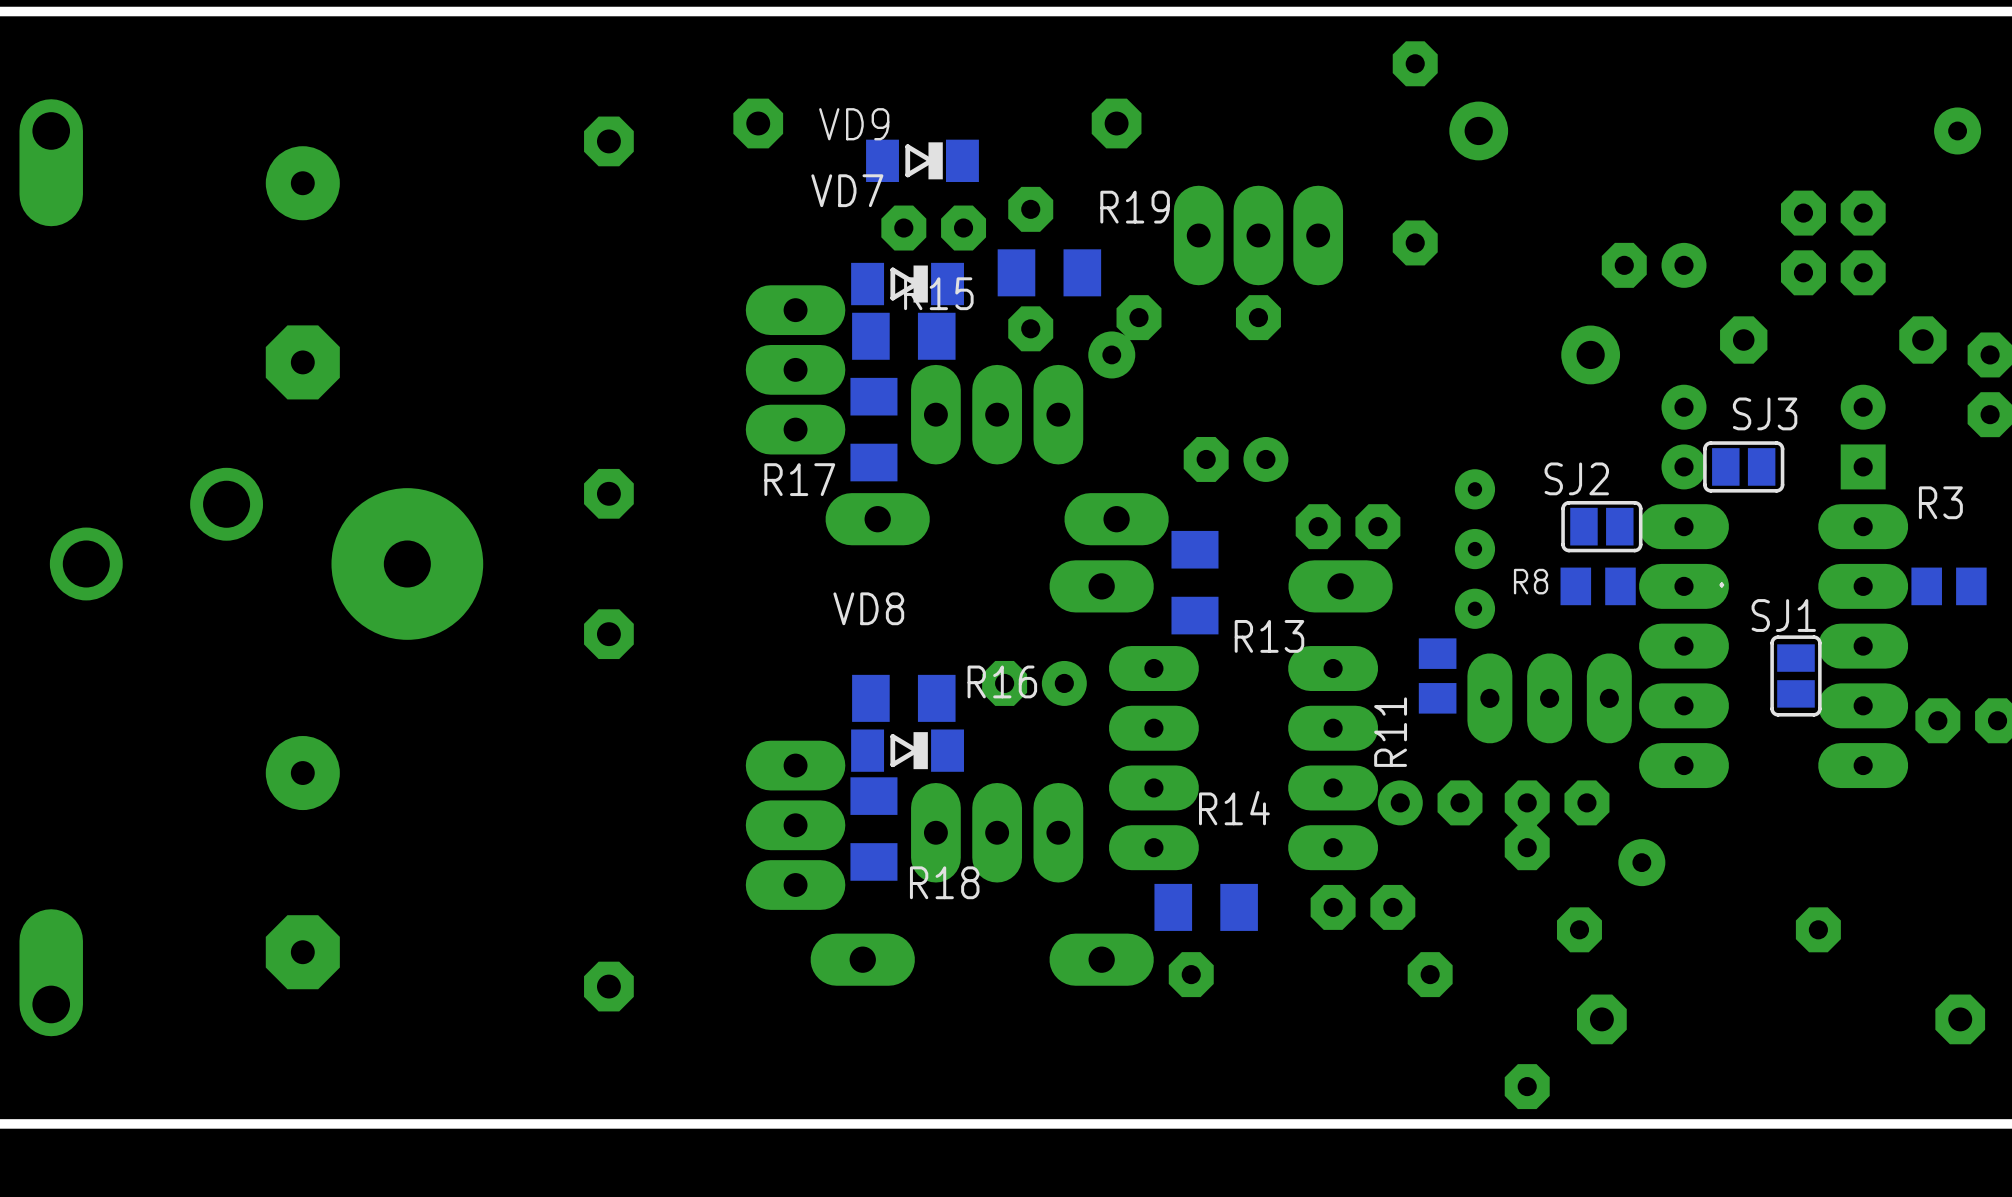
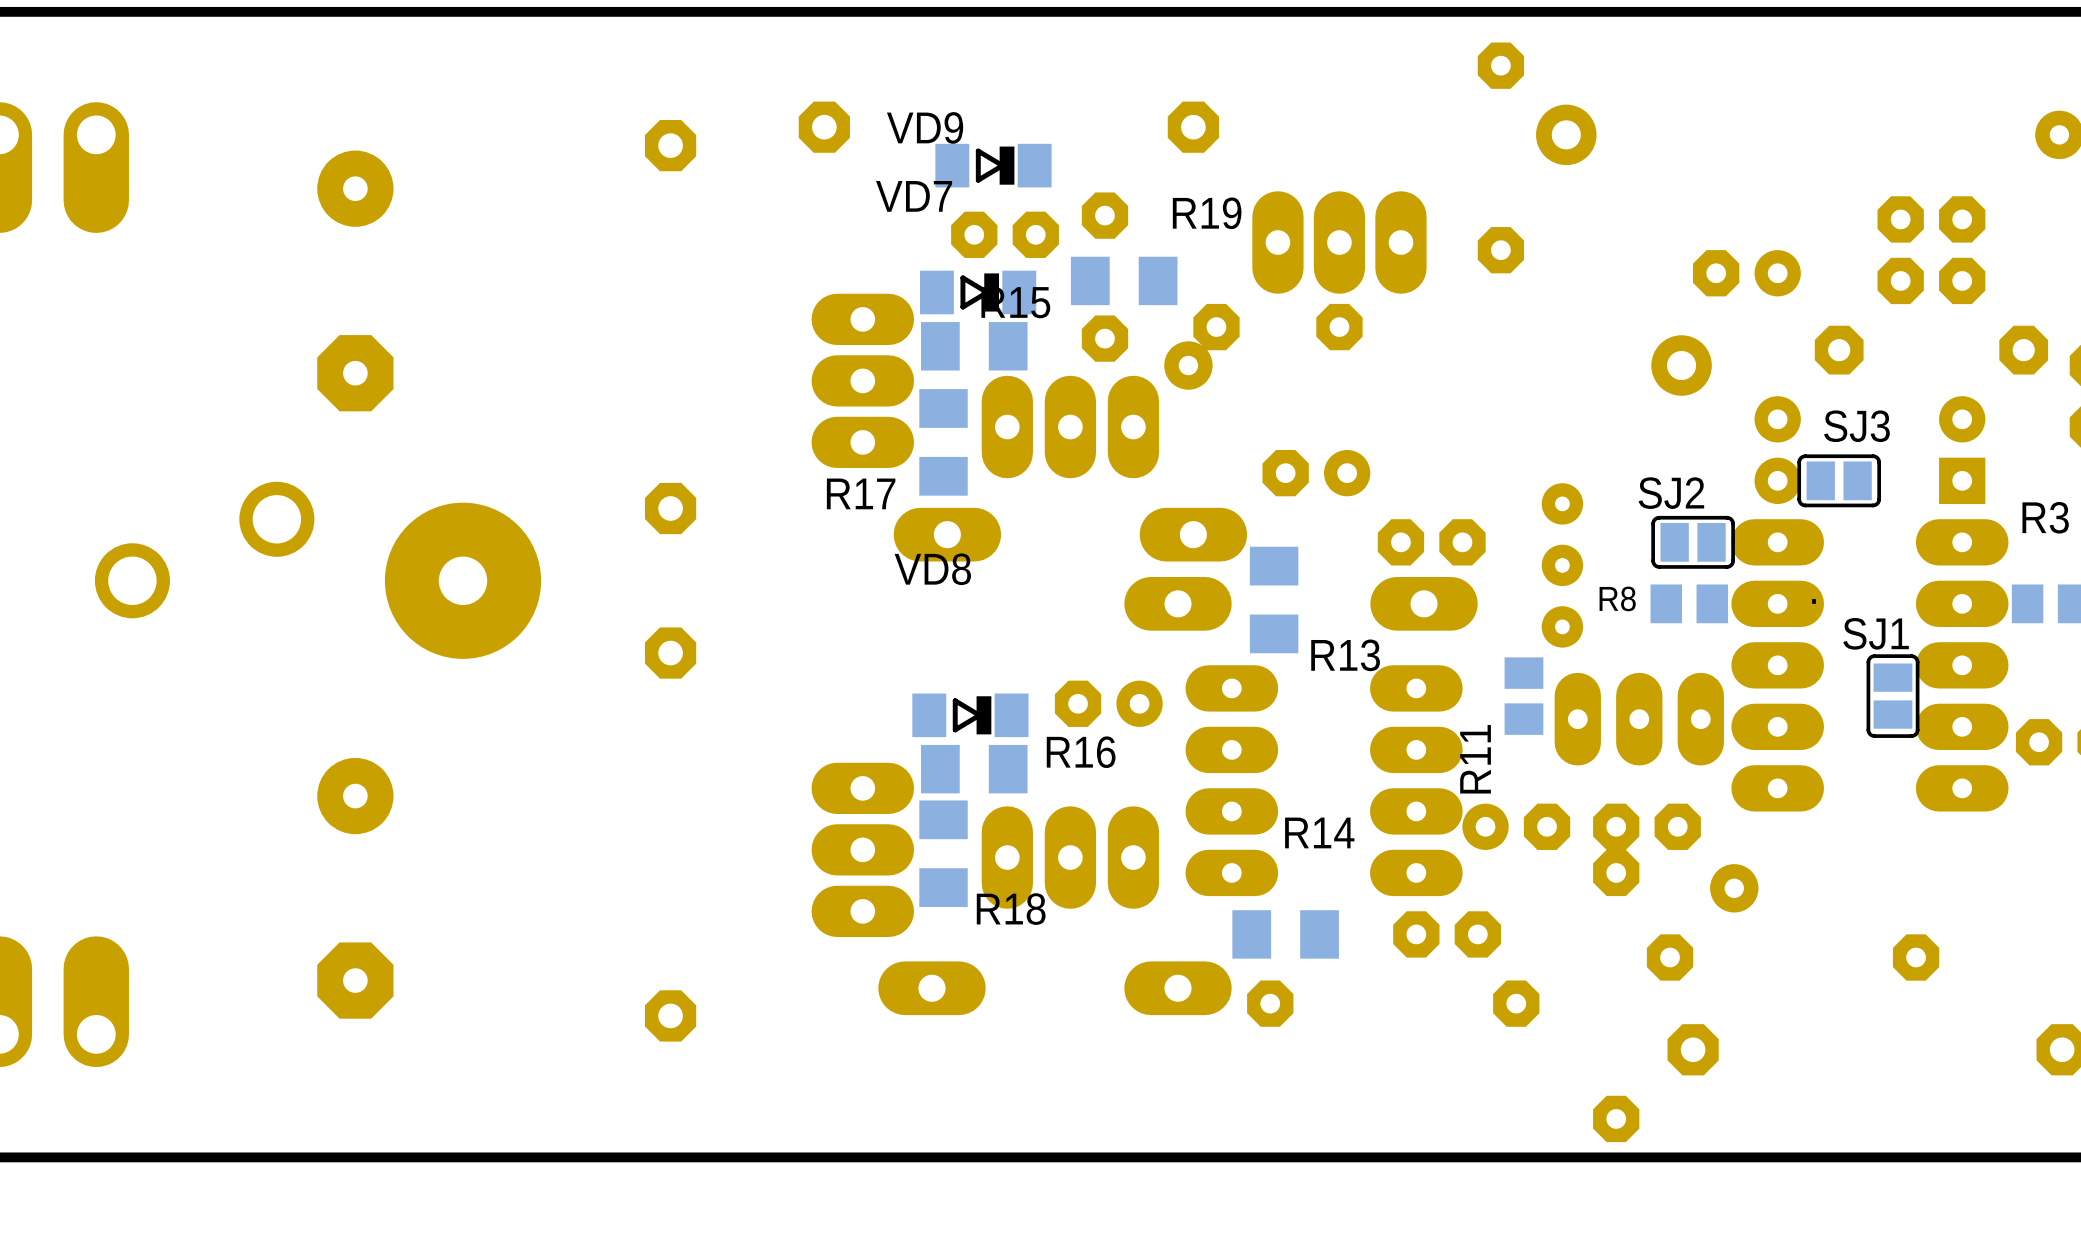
R16 position: (903, 698) -> (974, 769)
VD8 position: (907, 750) -> (970, 715)

